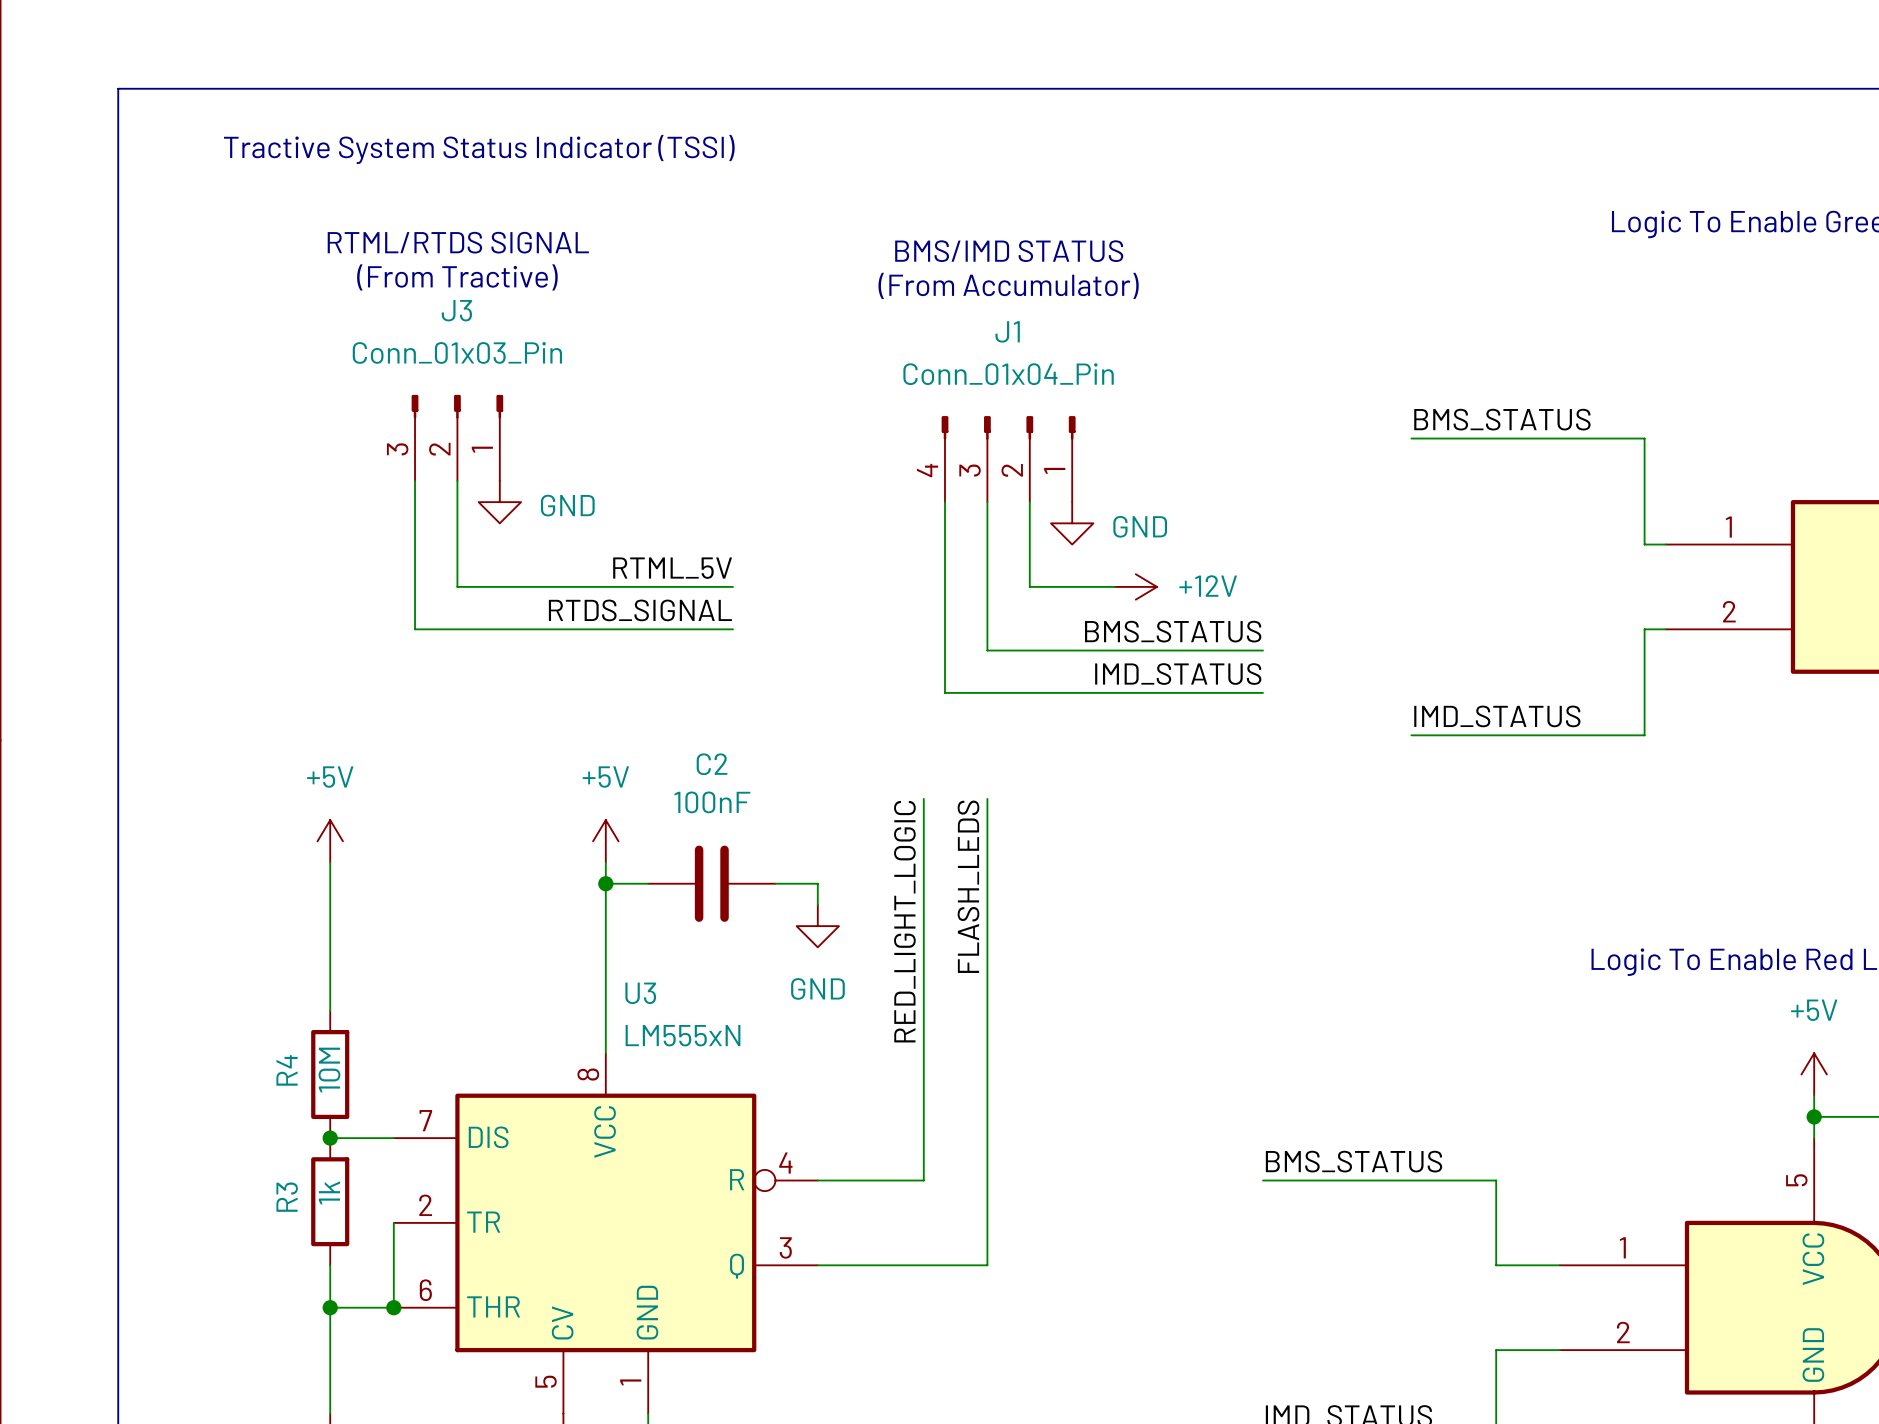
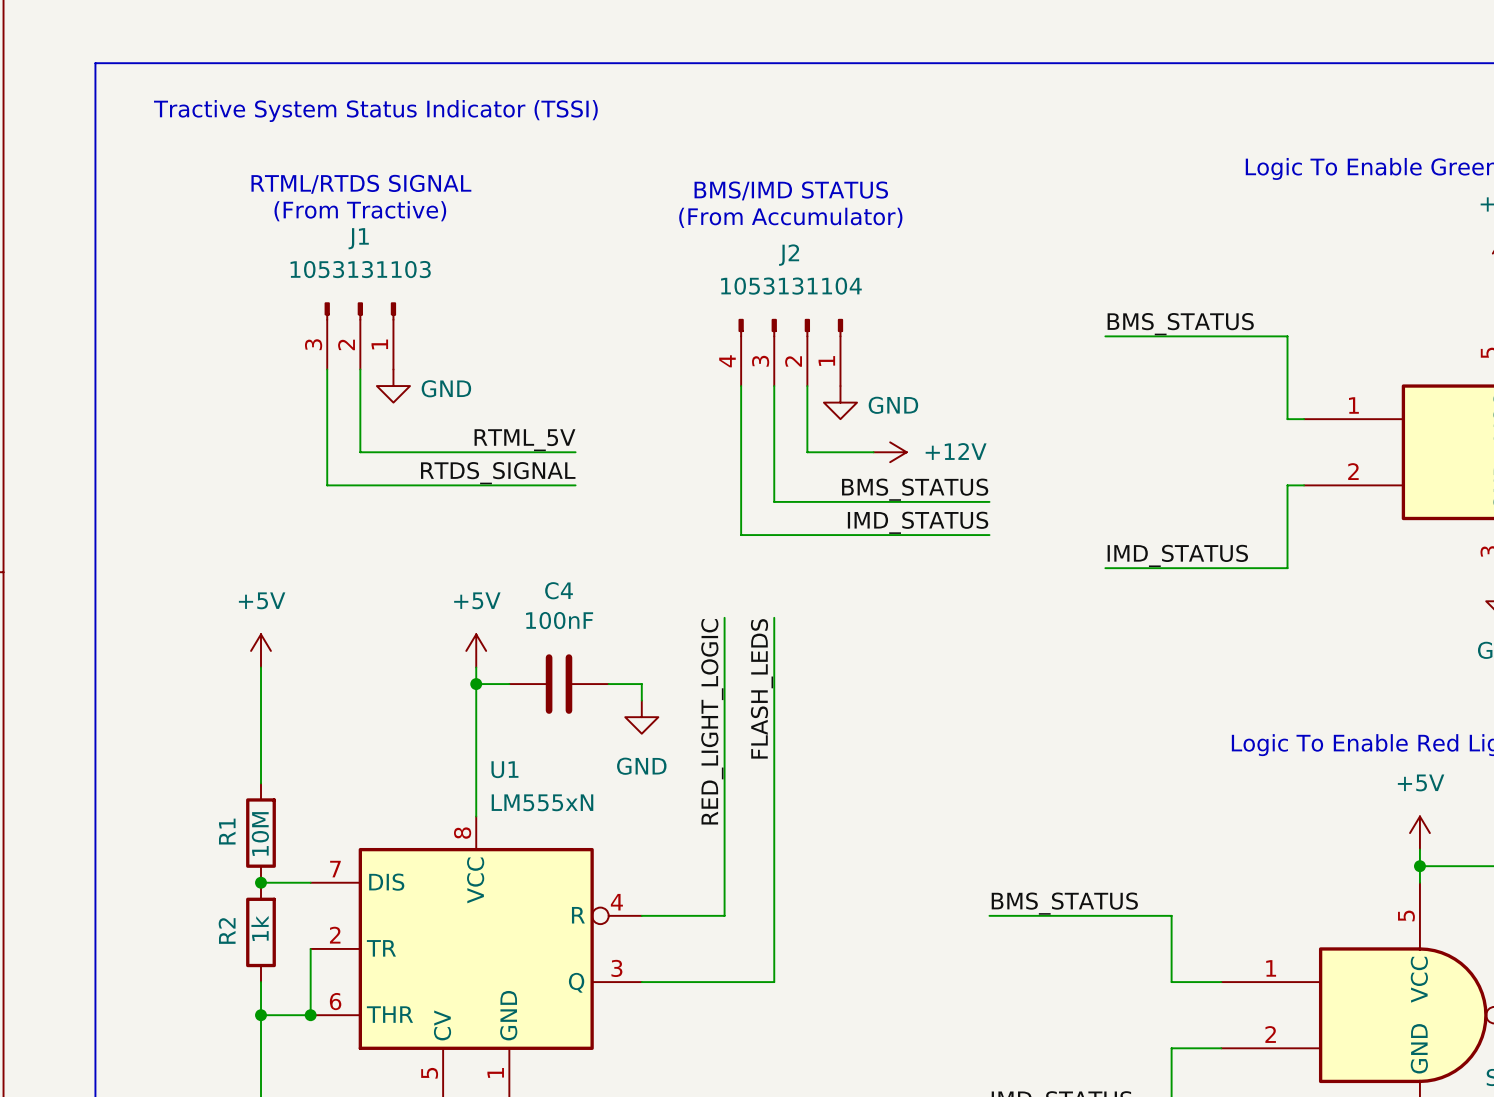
J3 name: J3 (456, 310) -> J1 (358, 238)
J1 name: J1 (1007, 331) -> J2 (789, 255)
J3 value: Conn_01x03_Pin (457, 352) -> 1053131103 (360, 269)
J1 value: Conn_01x04_Pin (1008, 374) -> 1053131104 (791, 286)
C2 name: C2 (712, 764) -> C4 (559, 590)
U3 name: U3 (640, 993) -> U1 (504, 769)
R4 name: R4 (287, 1070) -> R1 (227, 831)
R3 name: R3 (287, 1197) -> R2 (227, 930)

